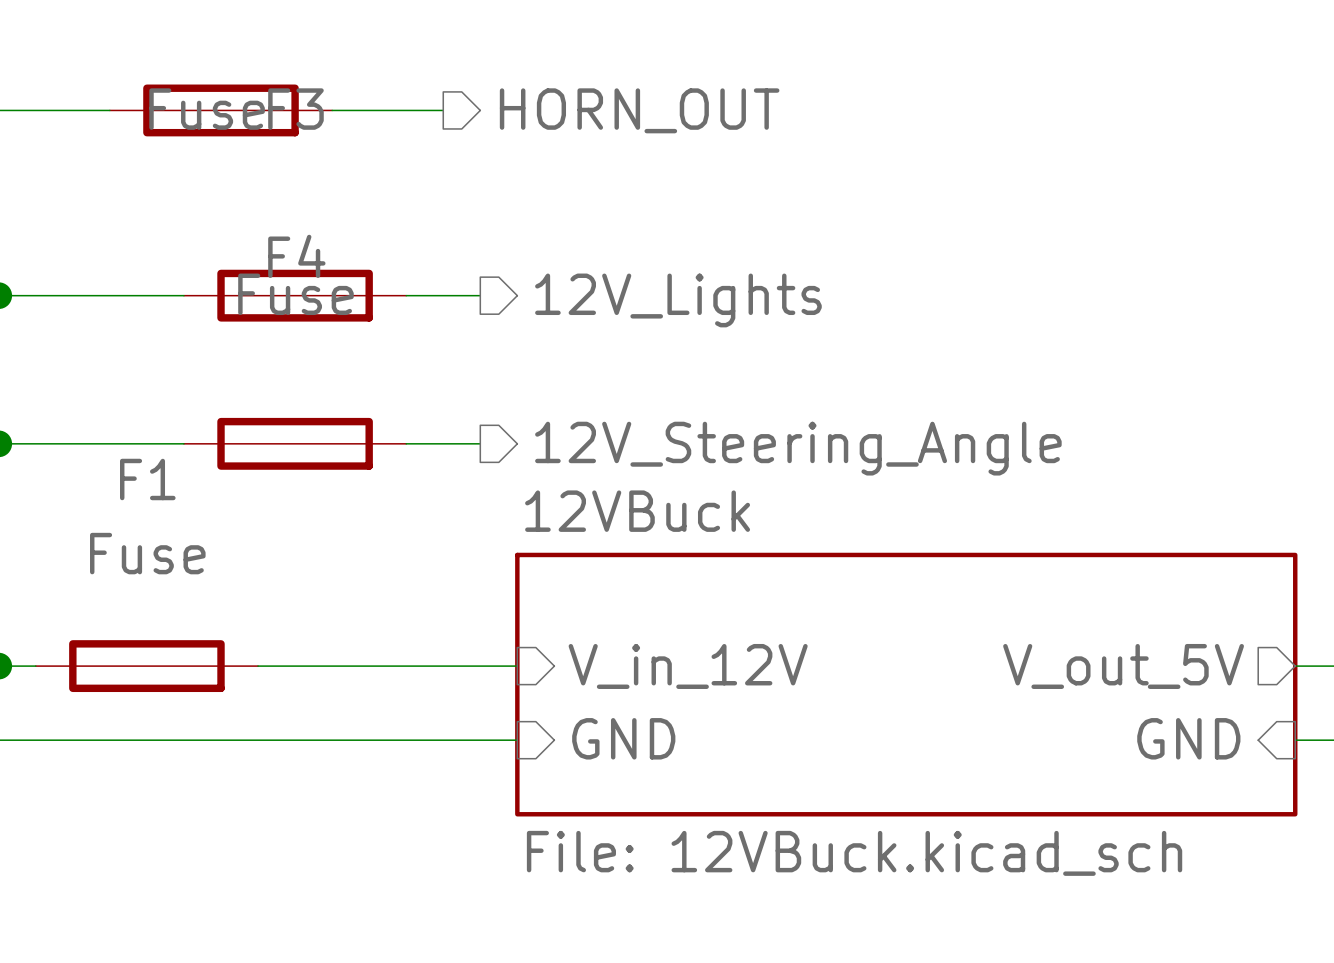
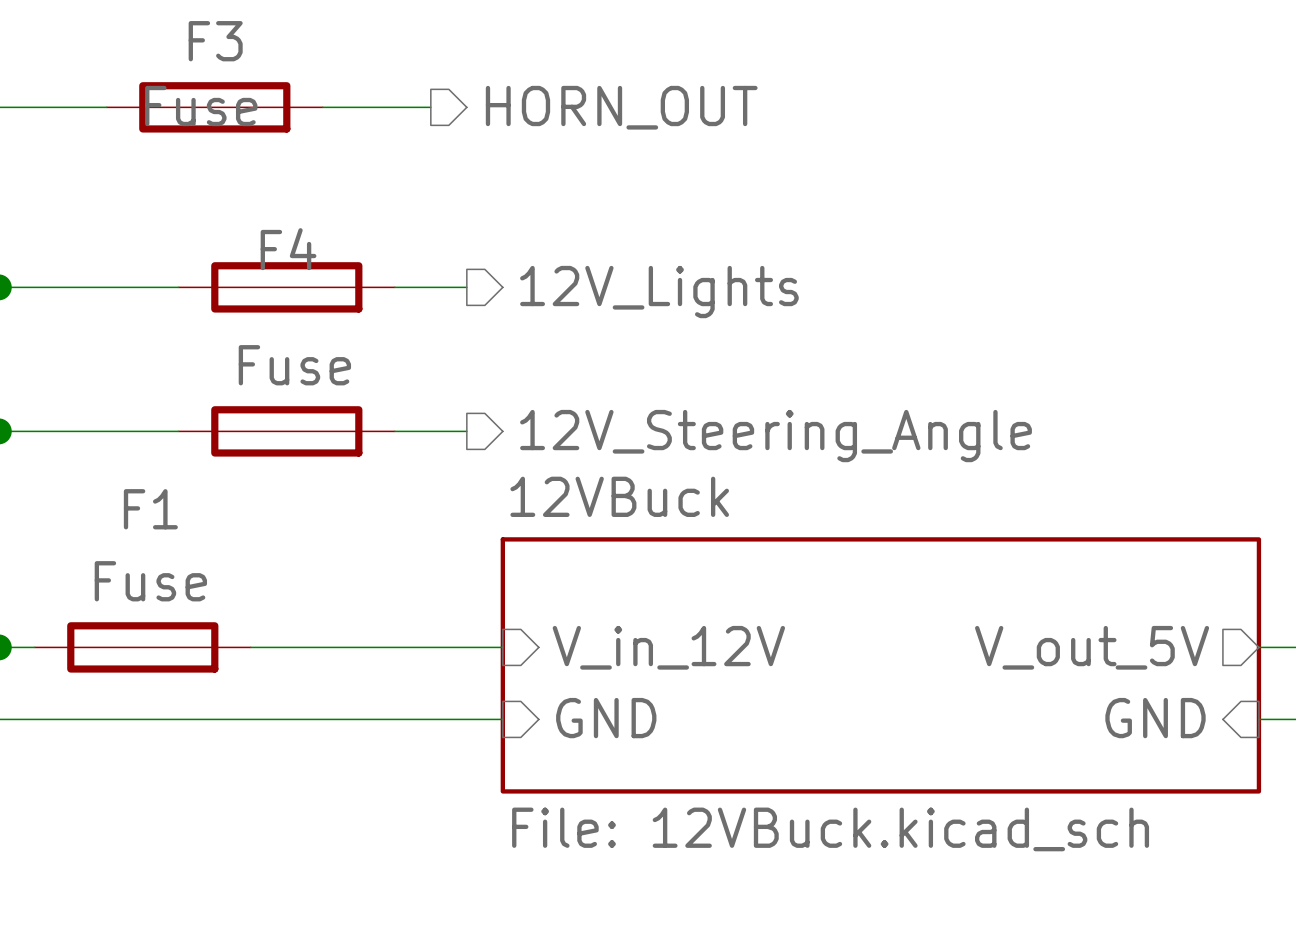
F3 name position: F3 (295, 109) -> F3 (215, 41)
F4 value position: Fuse (295, 294) -> Fuse (294, 365)
F1 name position: F1 (147, 479) -> F1 (150, 509)
F1 value position: Fuse (147, 553) -> Fuse (150, 581)

